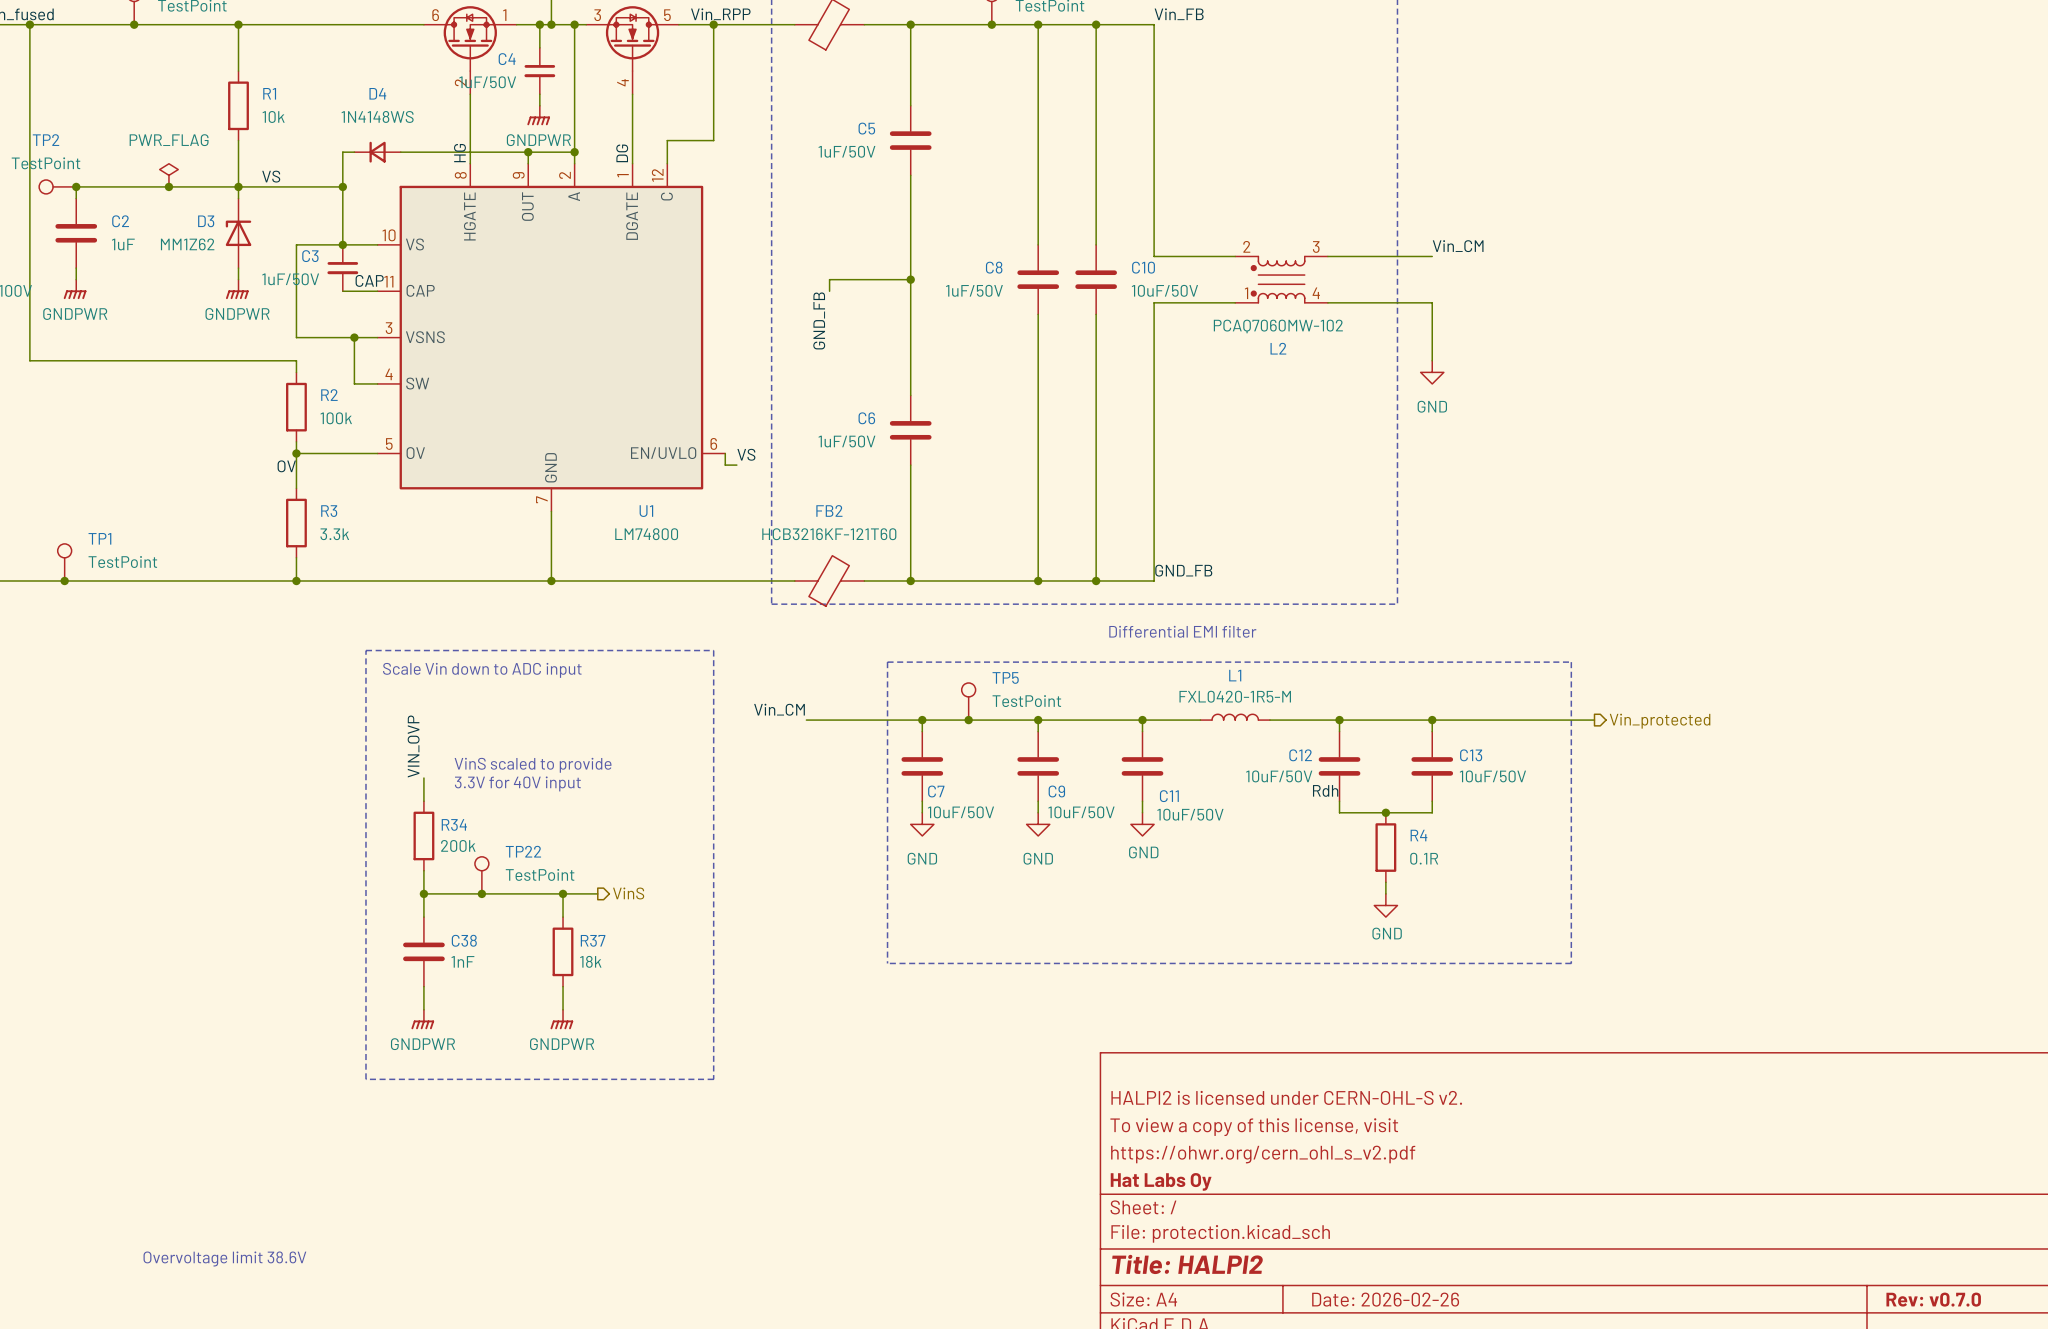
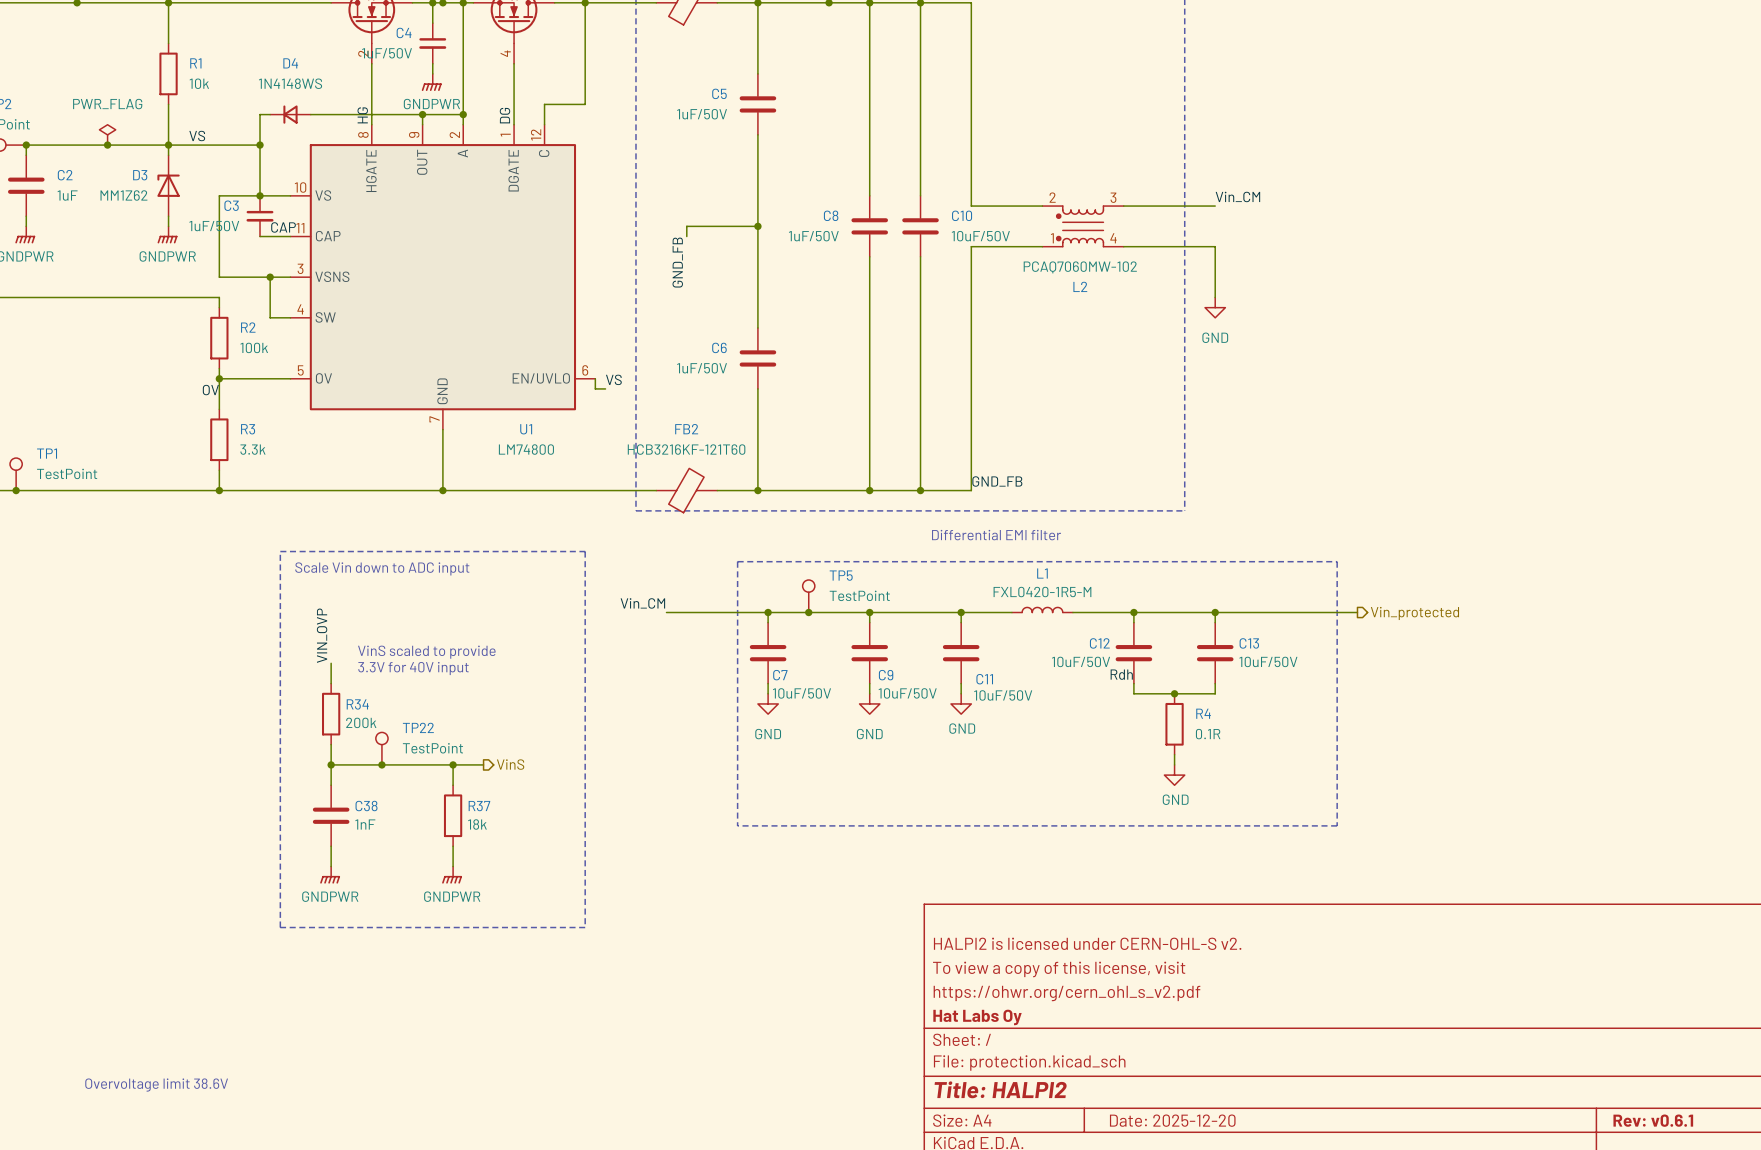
title block: Date: 2026-02-26 (1385, 1299) -> Date: 2025-12-20 (1172, 1120)
title block: Rev: v0.7.0 (1933, 1299) -> Rev: v0.6.1 (1653, 1120)

